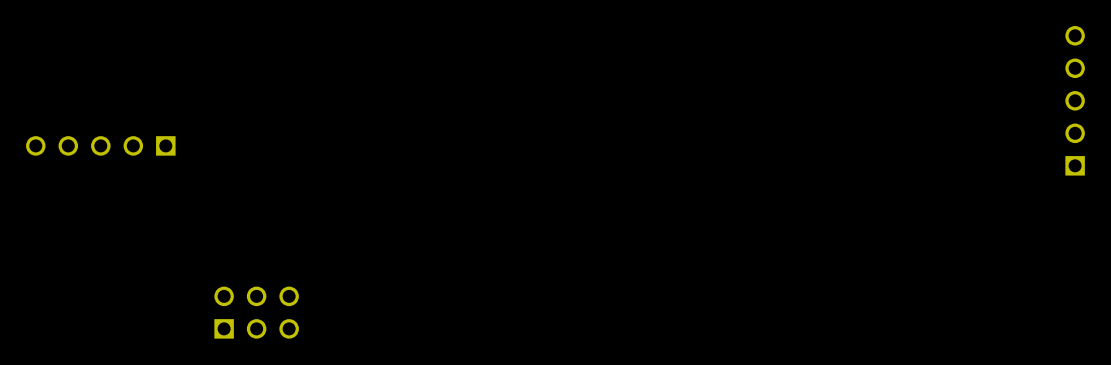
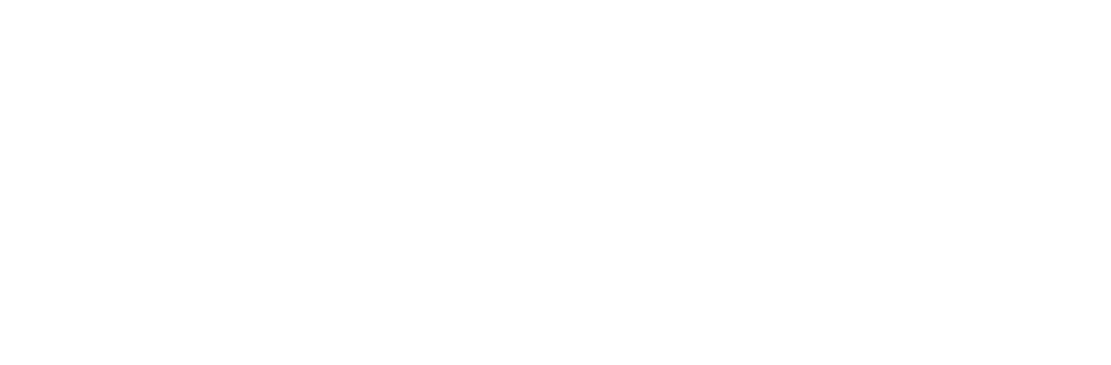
part: (1075, 100) -> none
part: (100, 145) -> none
part: (256, 312) -> none

